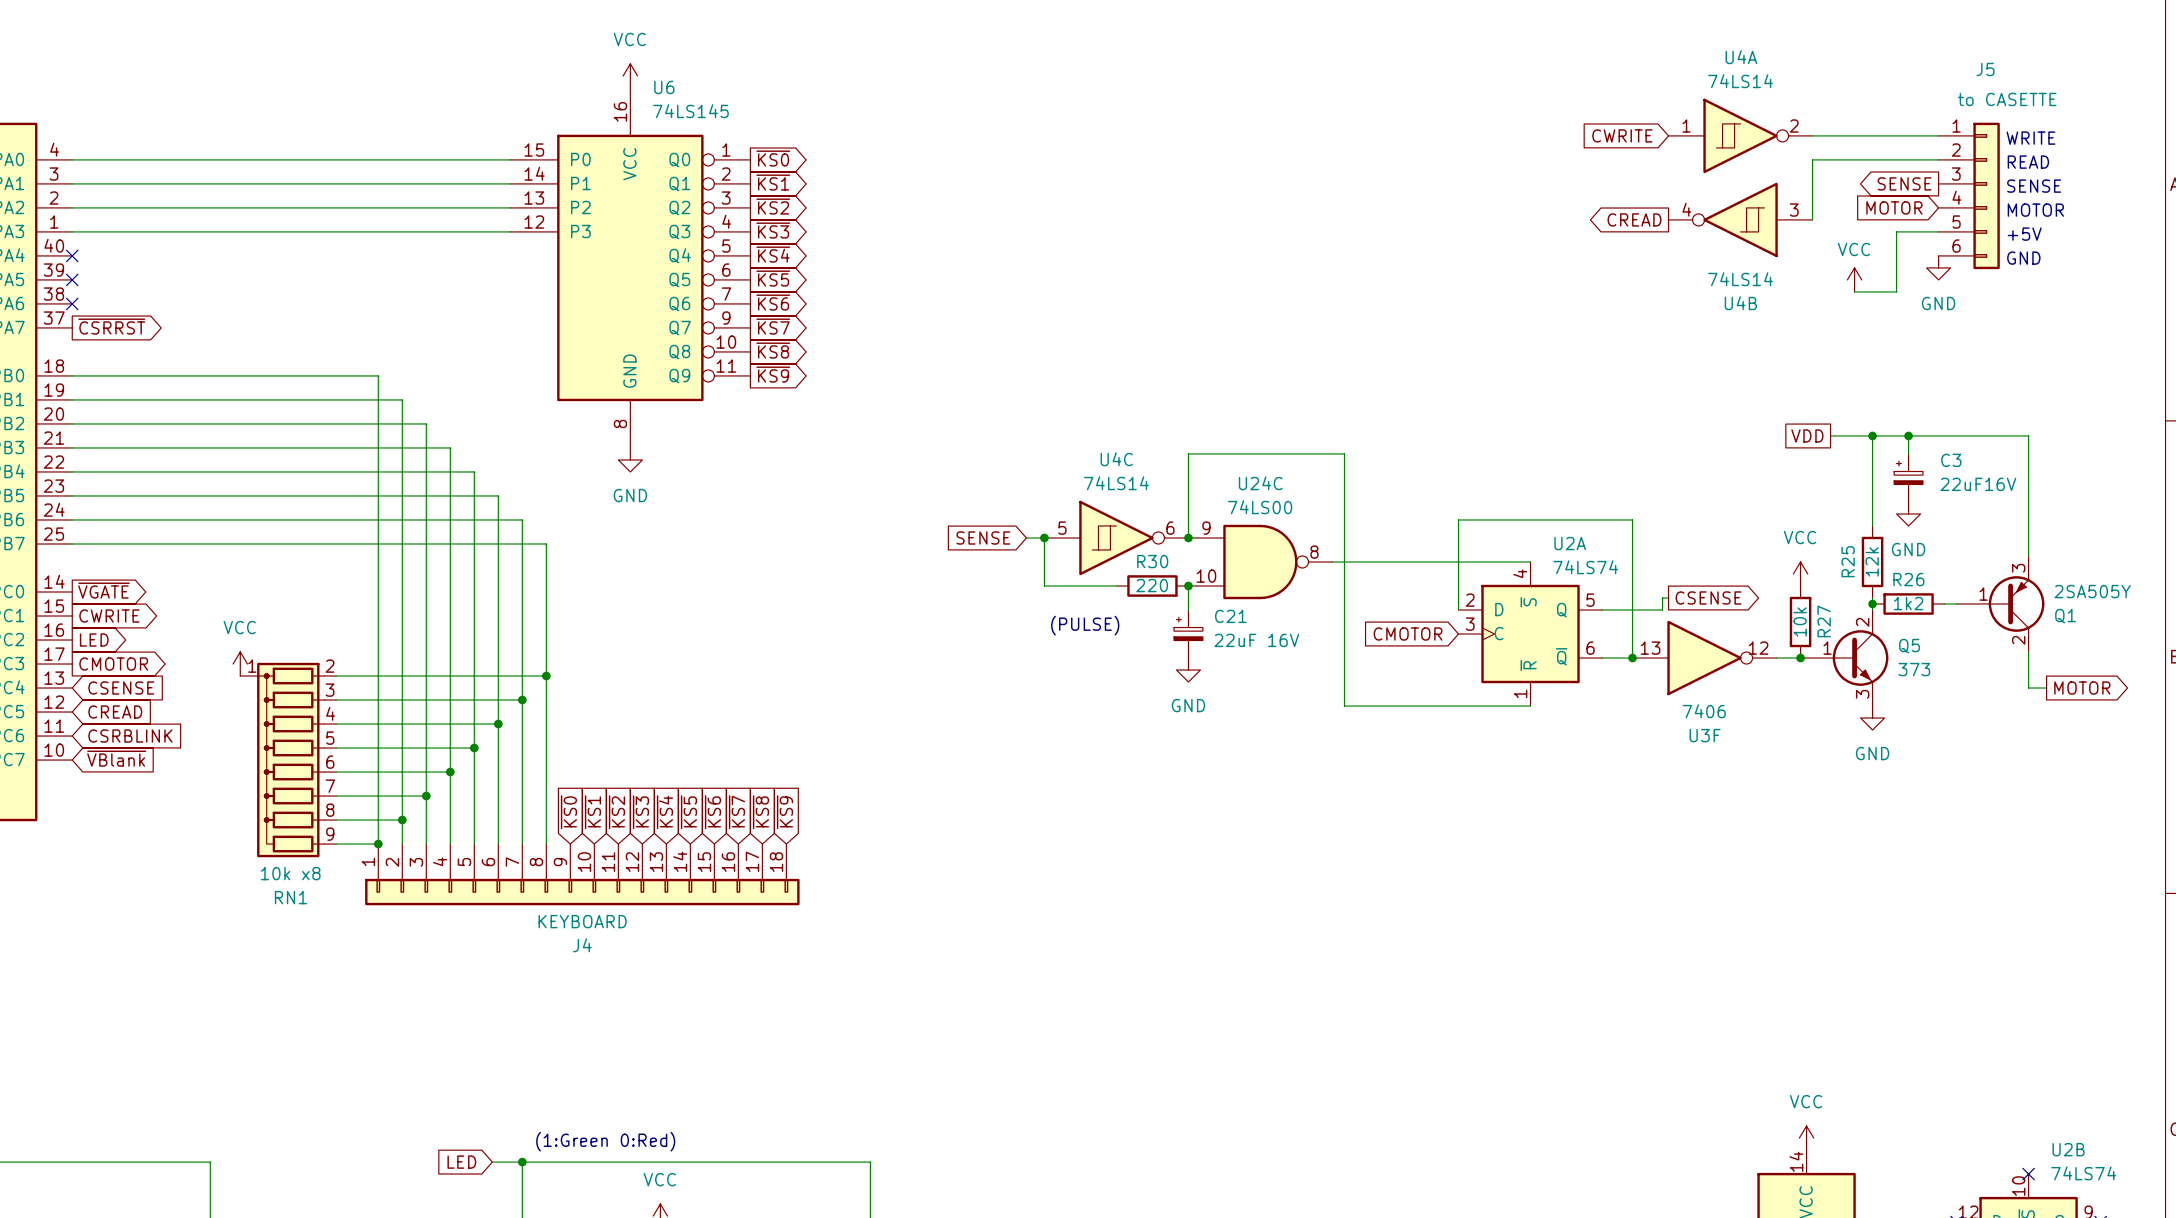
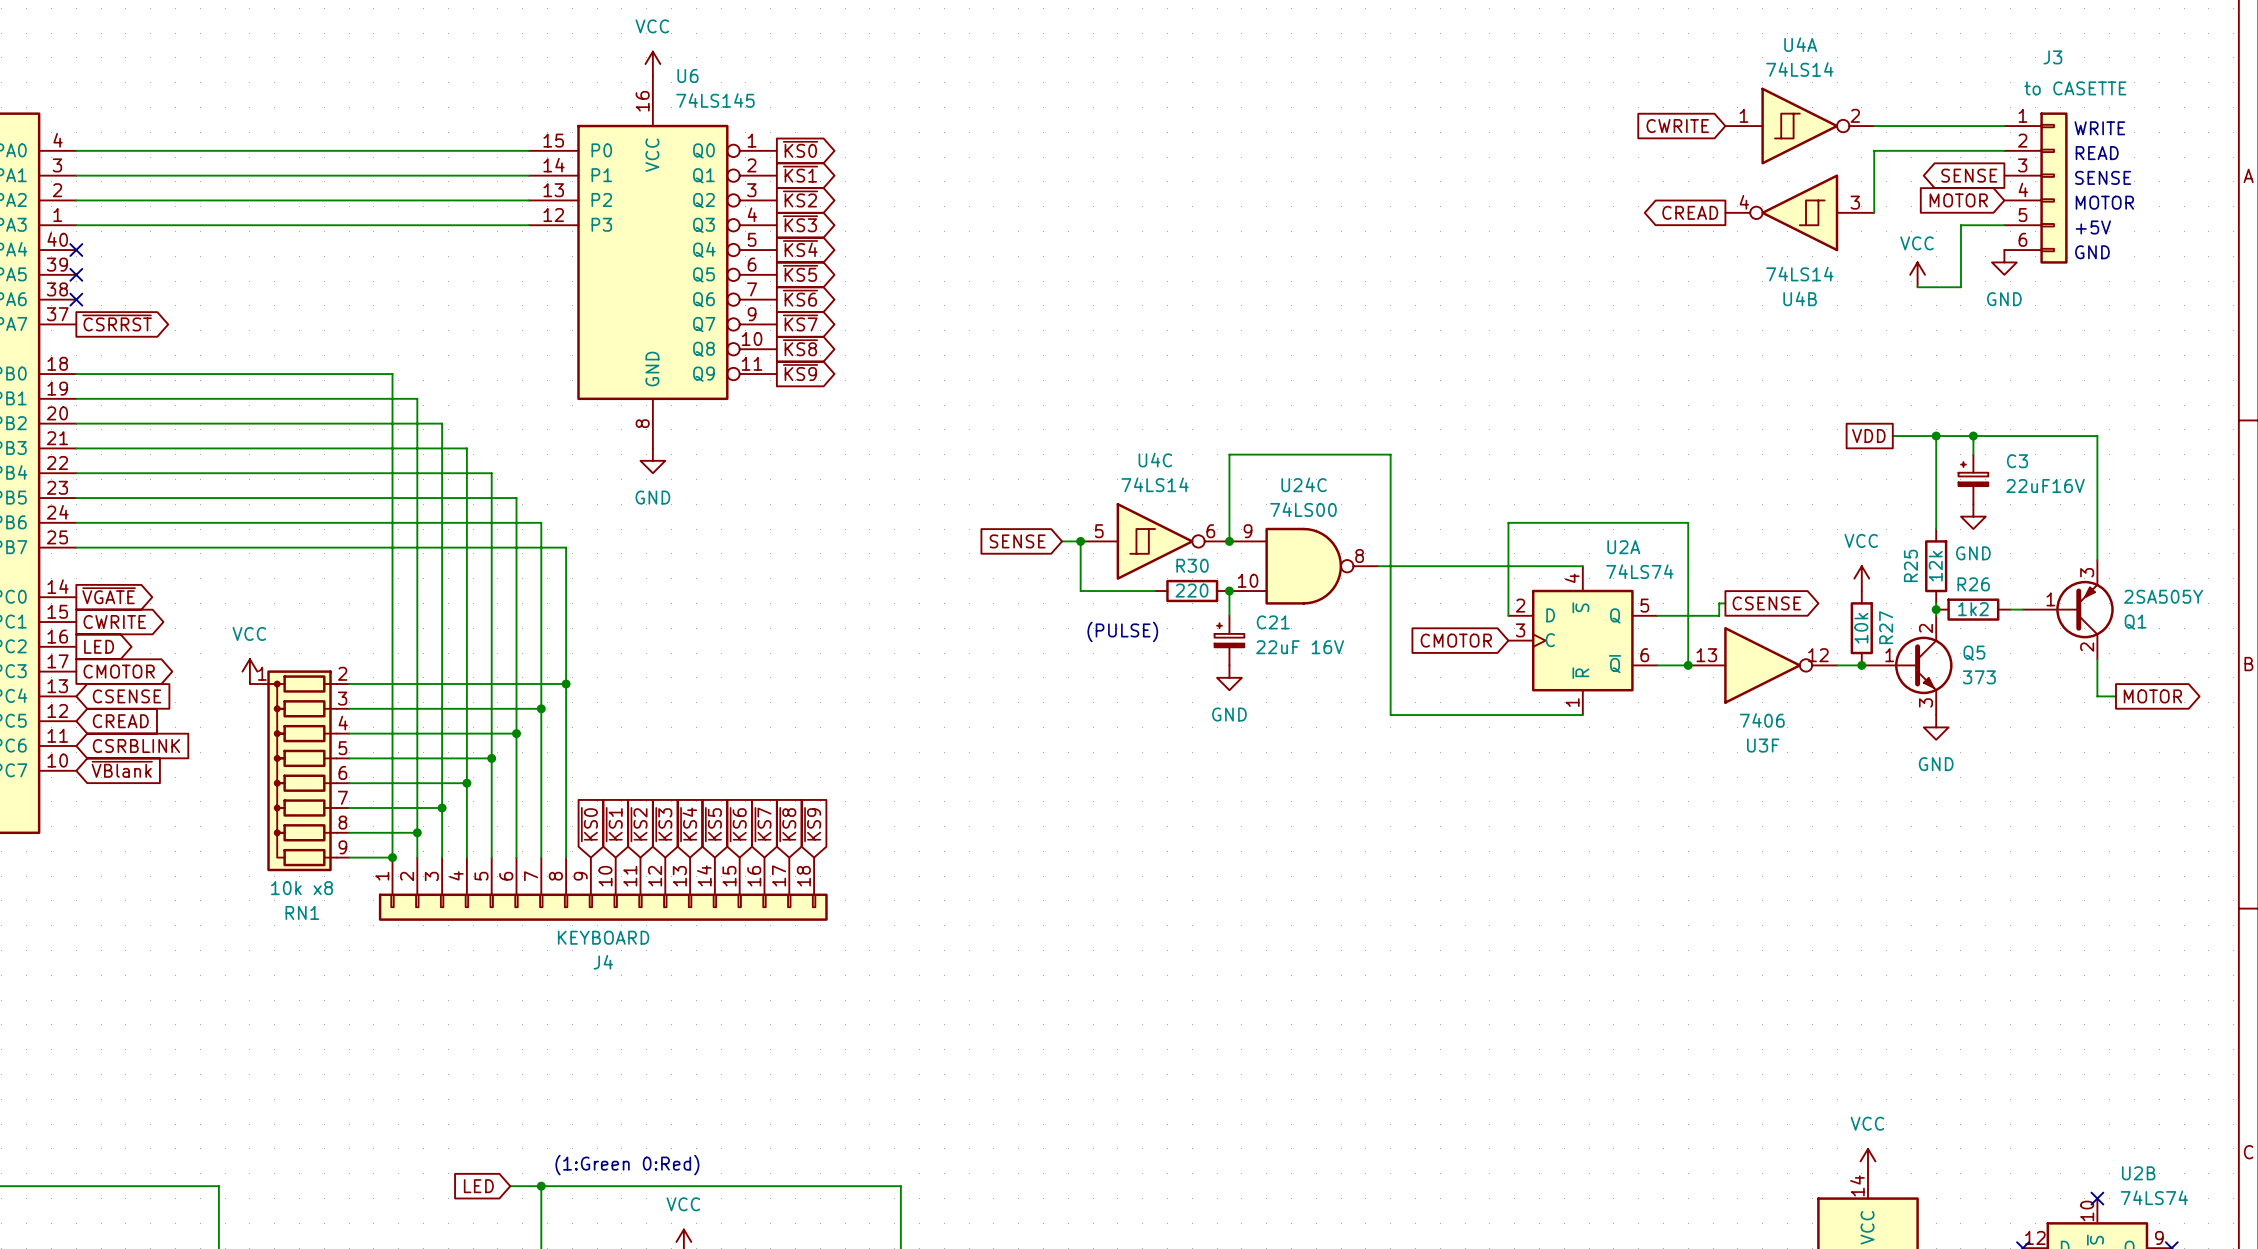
J5 name: J5 (1985, 69) -> J3 (2052, 57)

